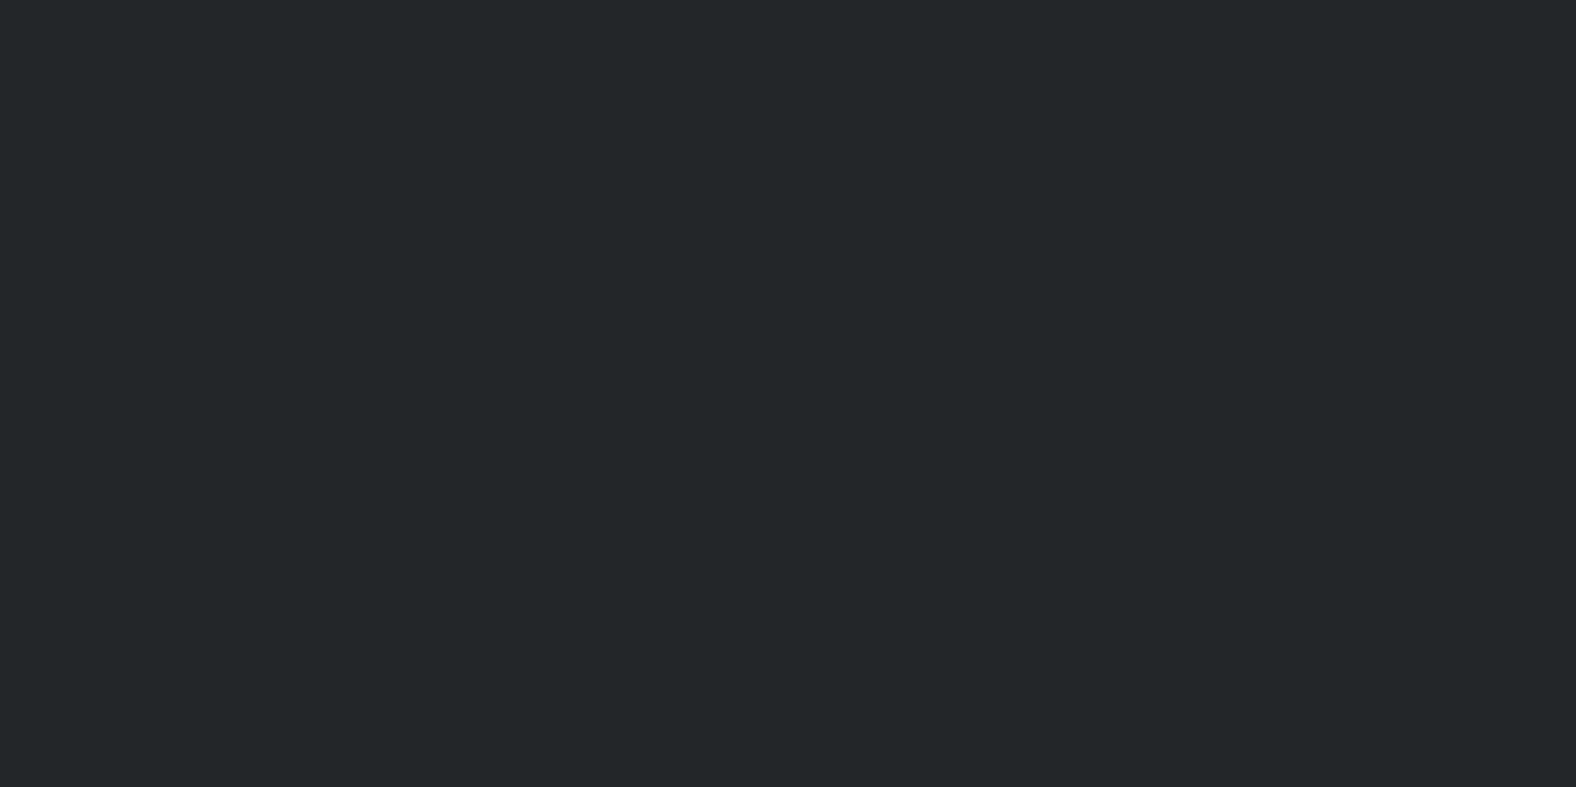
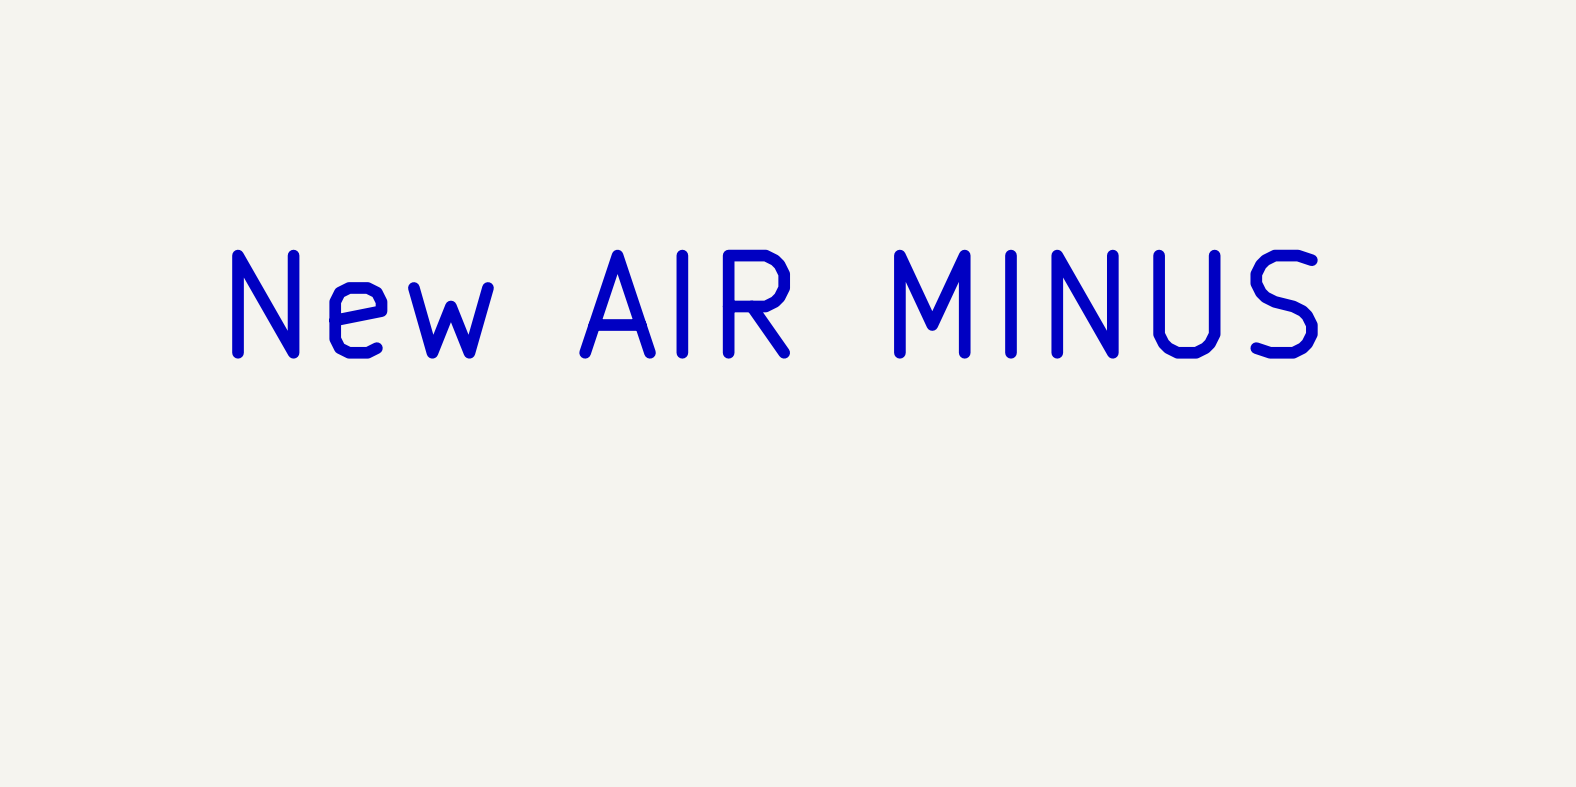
text: none -> New AIR MINUS (774, 304)

